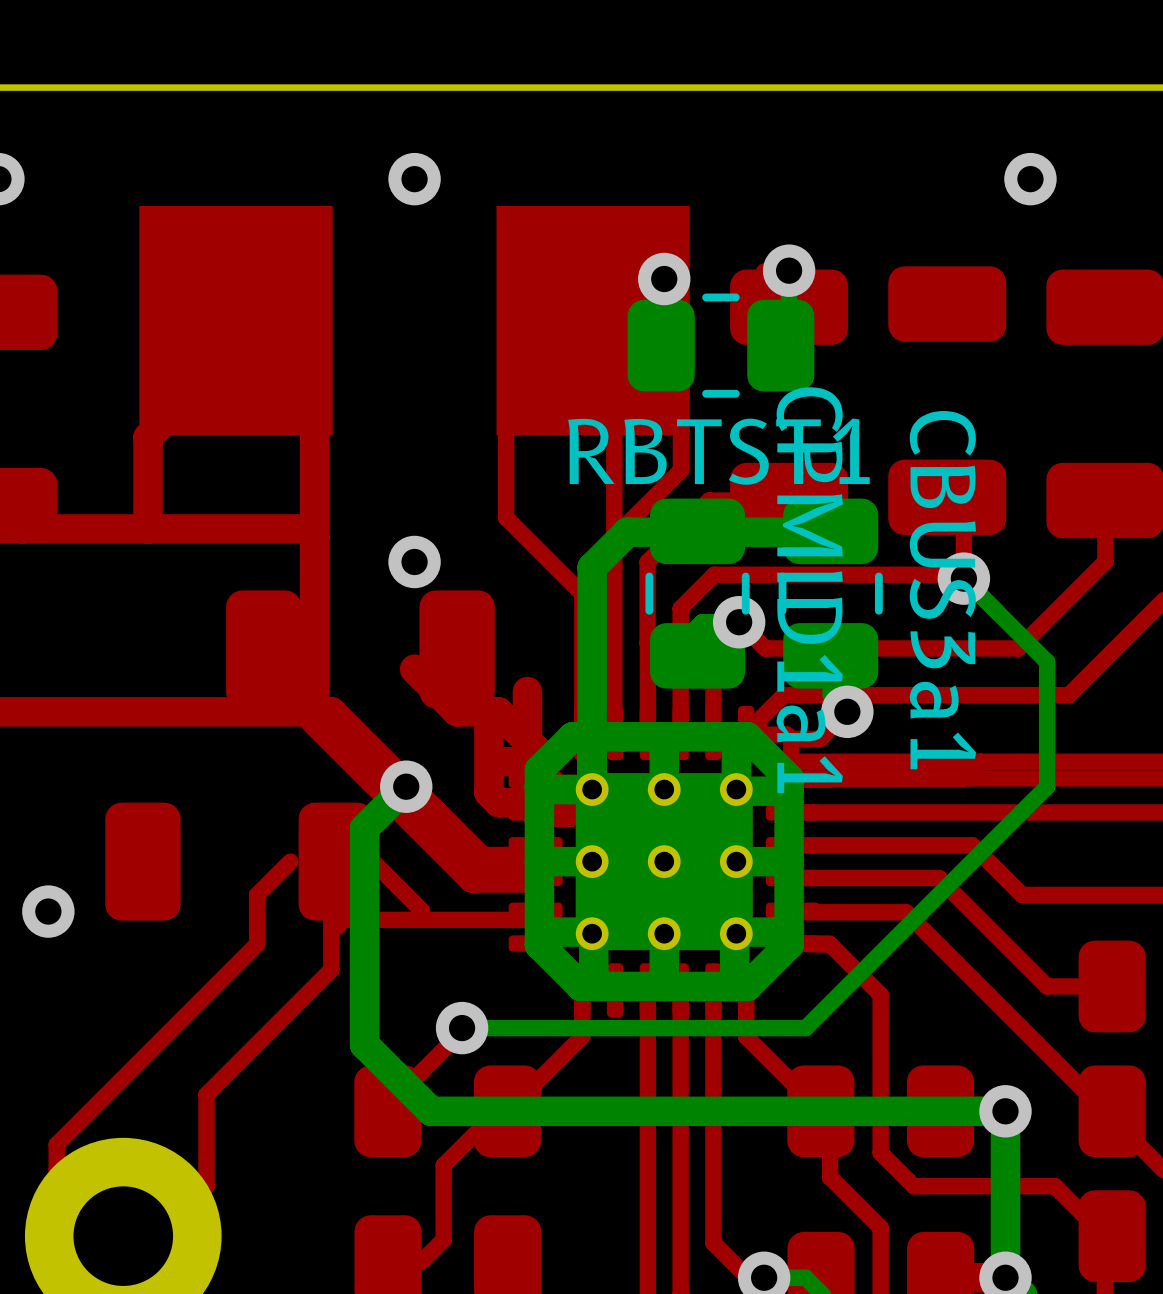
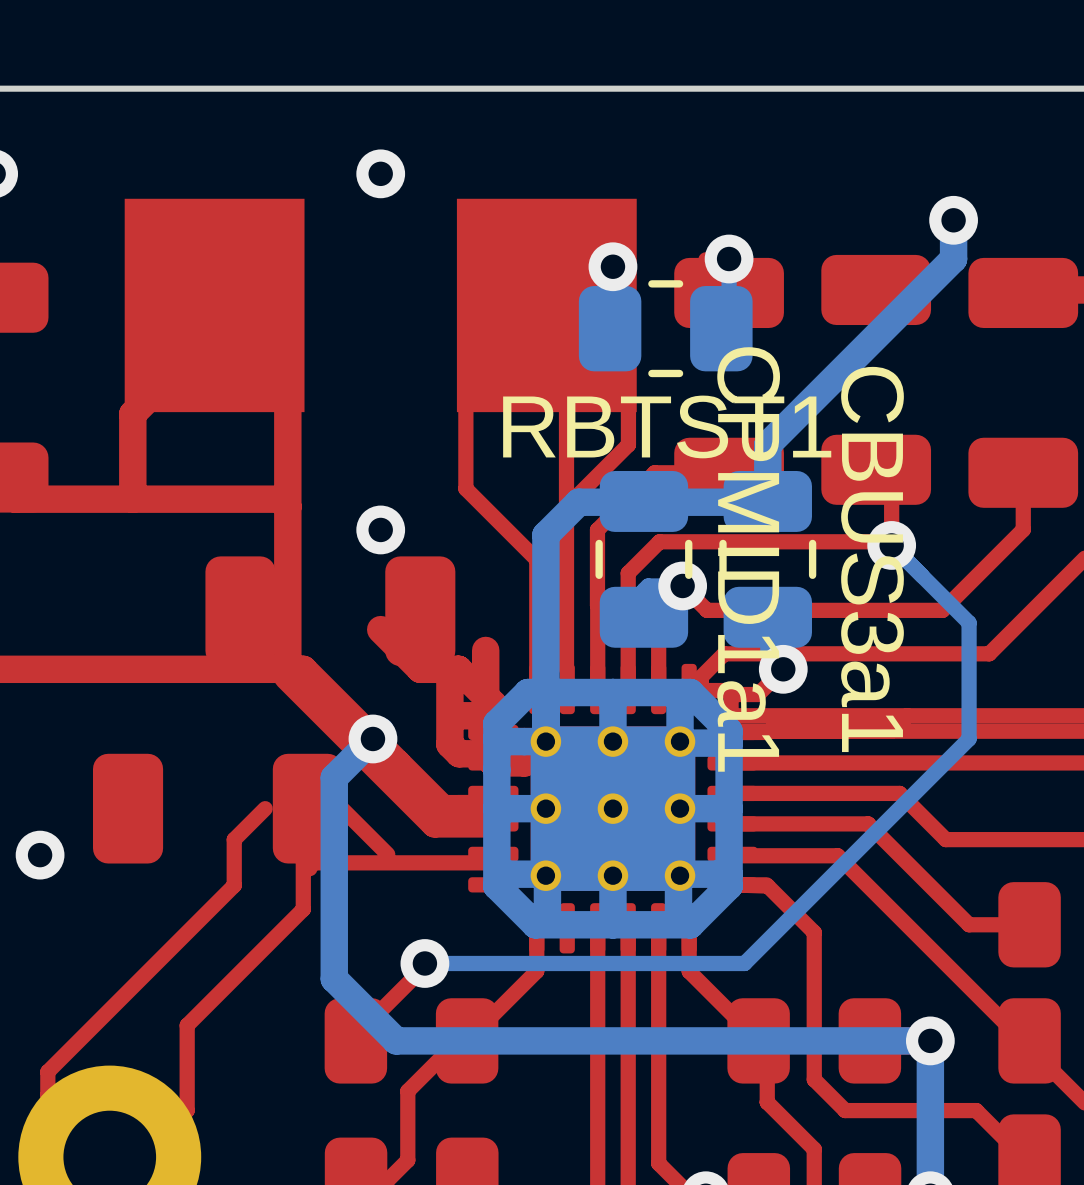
via position: (1030, 179) -> (953, 220)
bottom track: none -> (953, 220) (953, 259) (767, 444) (767, 496)

